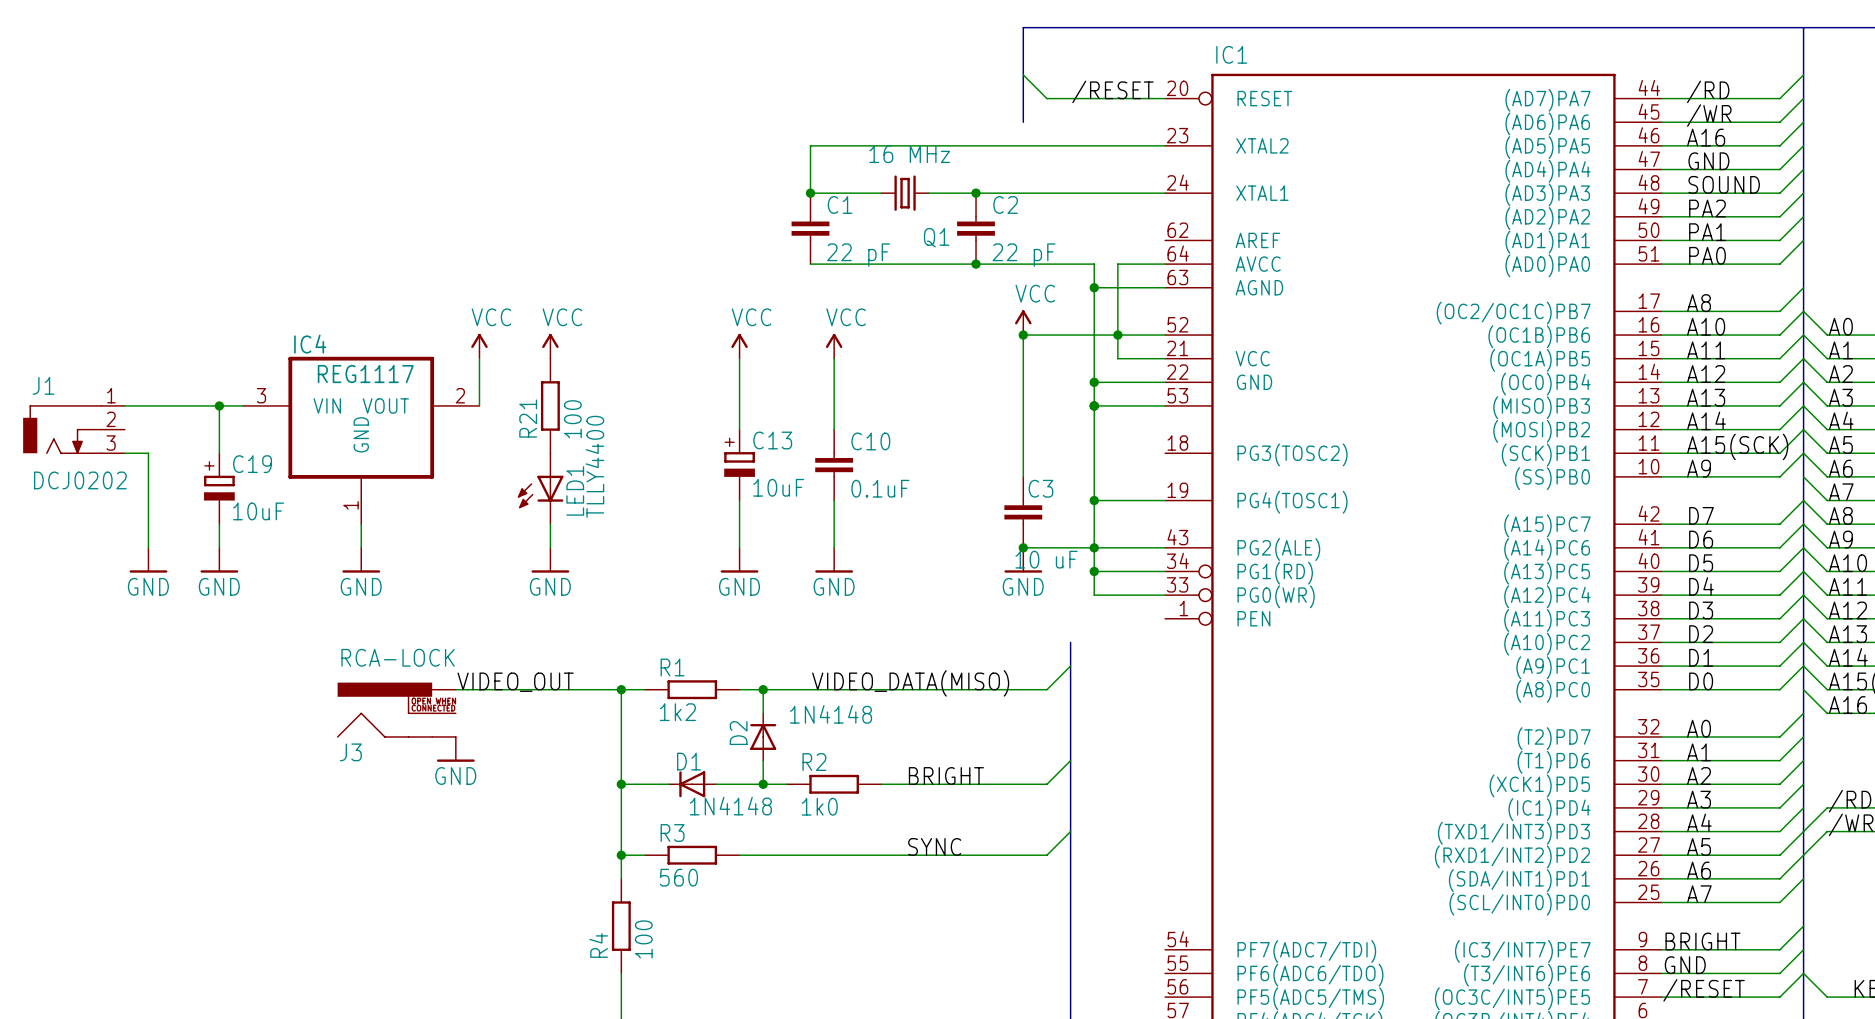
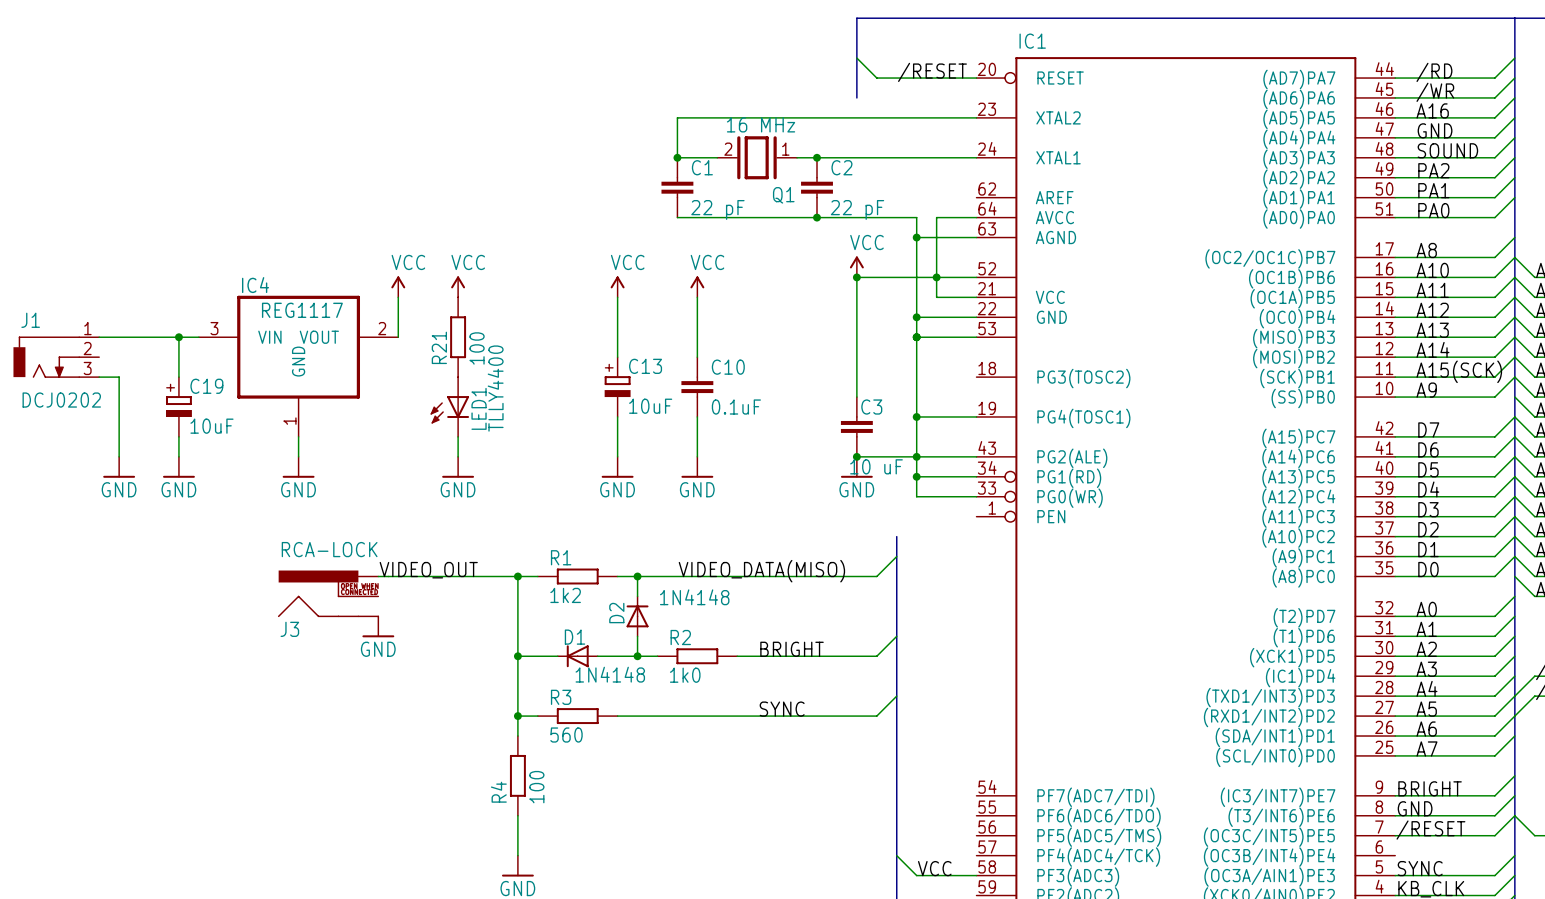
Q1 symbol: [880, 175, 930, 211] -> [717, 136, 798, 180]

